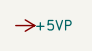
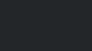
power symbol: +5VP (25, 25) -> none

